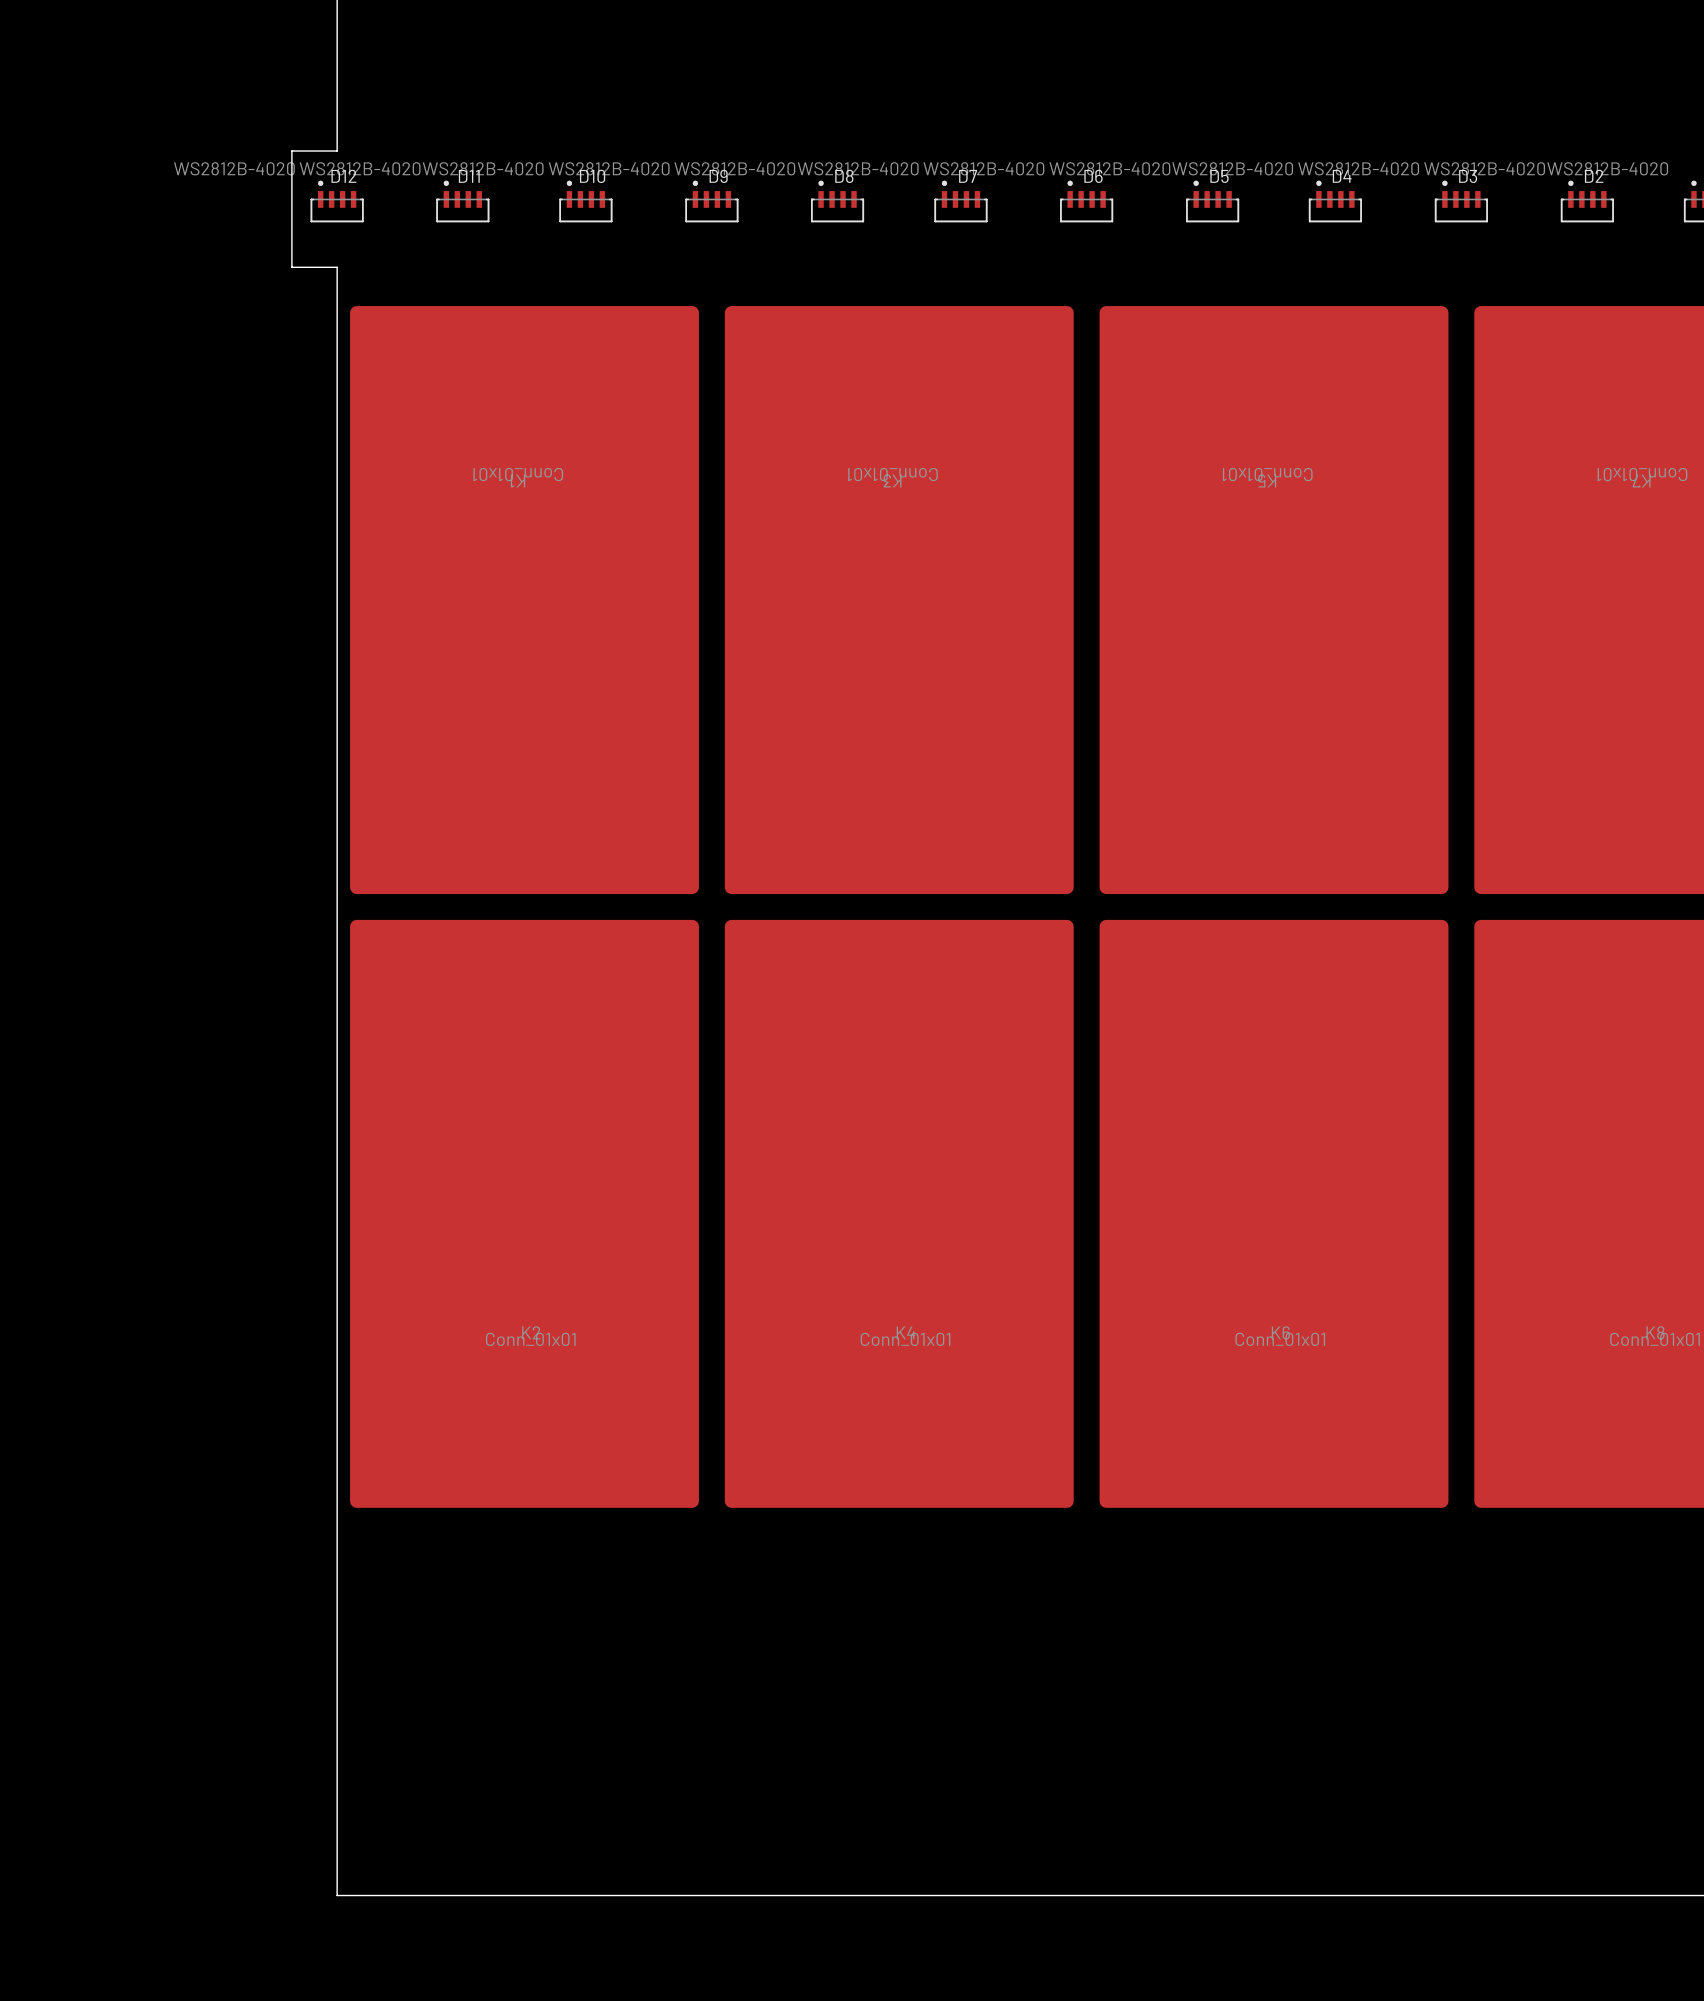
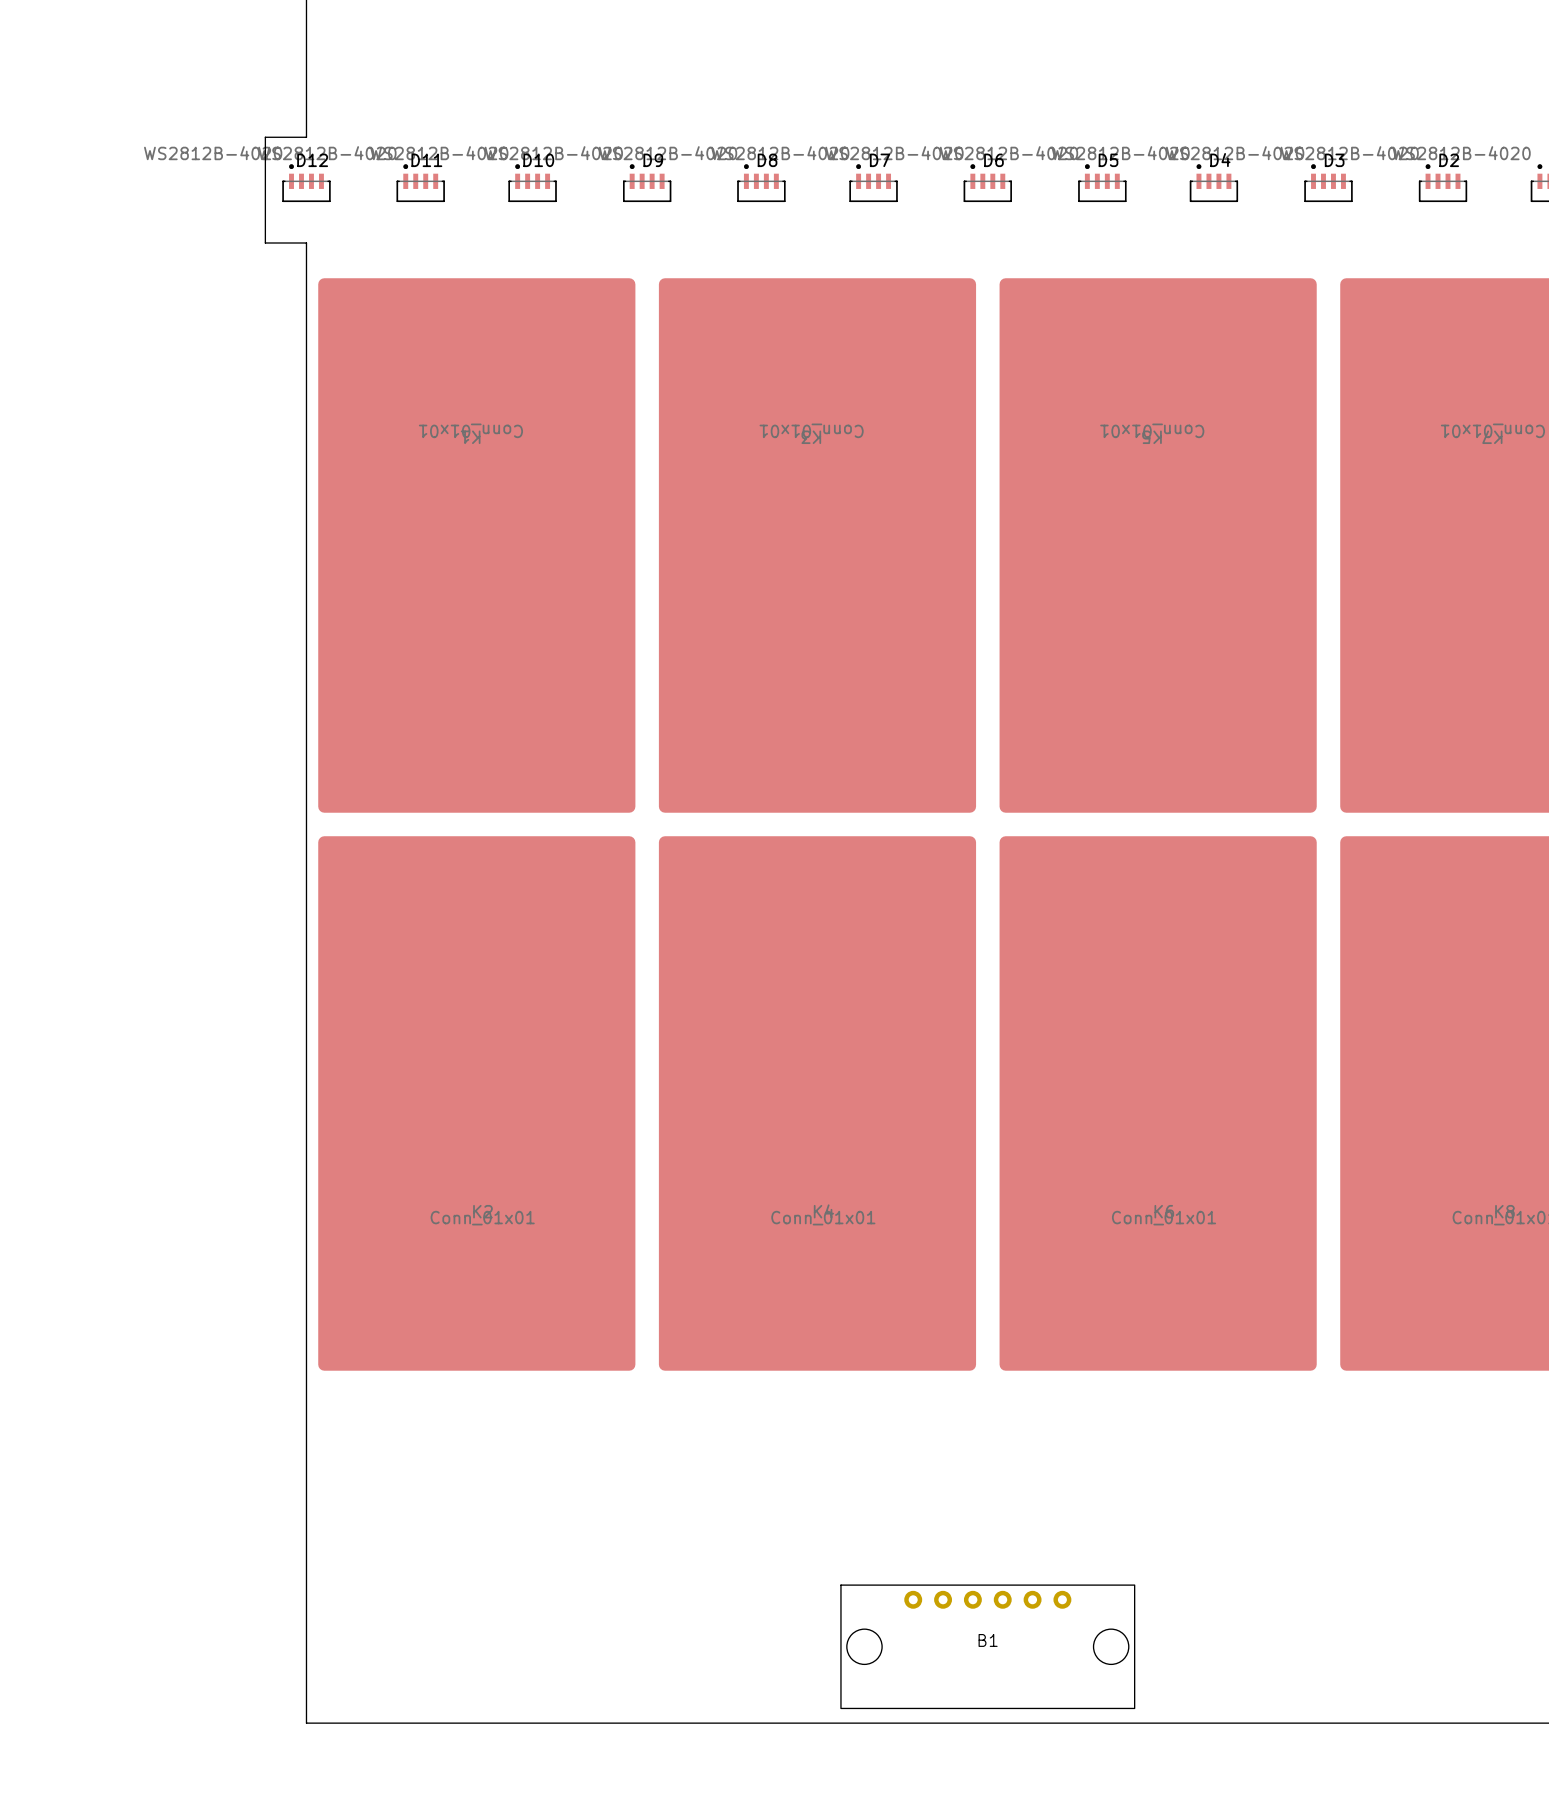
B1: none -> (987, 1646)

